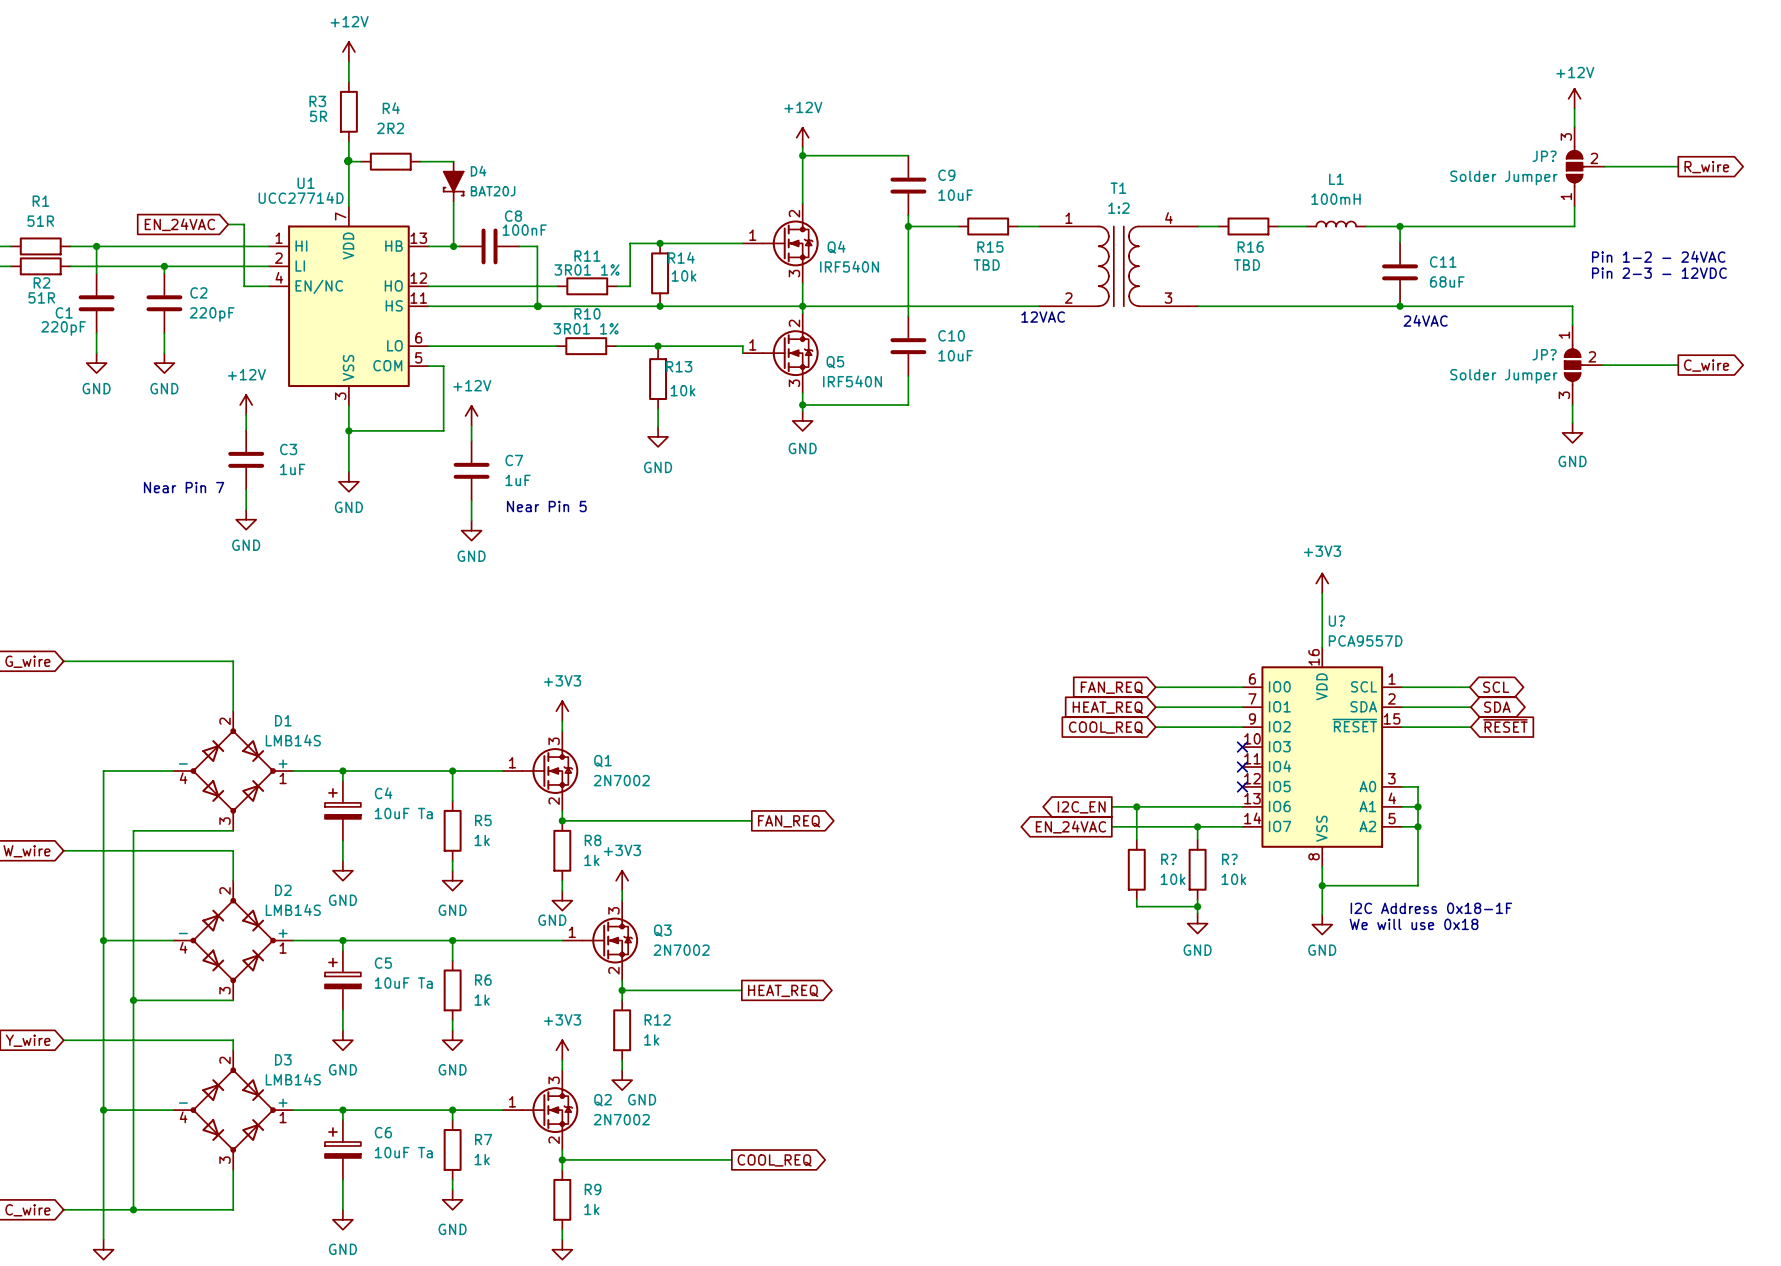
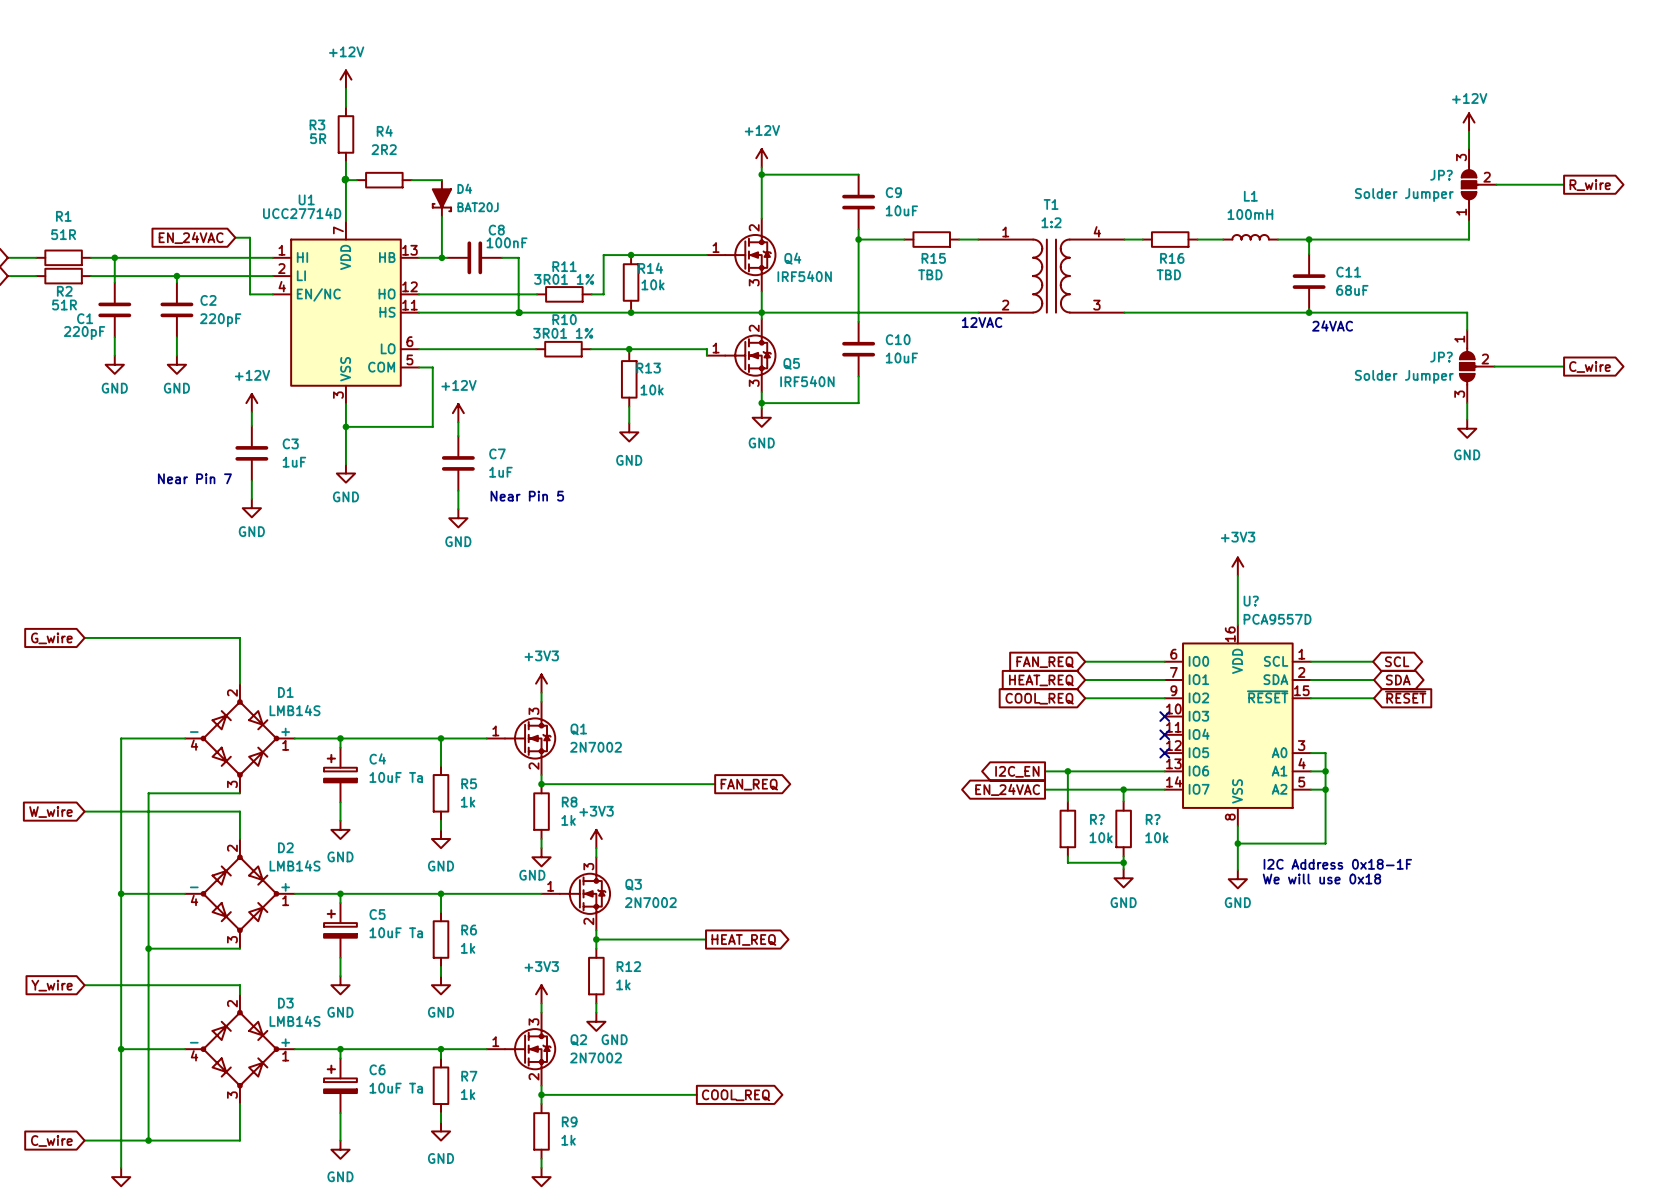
text: Pin 1-2 - 24VAC (1658, 256) -> none
text: Pin 2-3 - 12VDC (1659, 273) -> none

